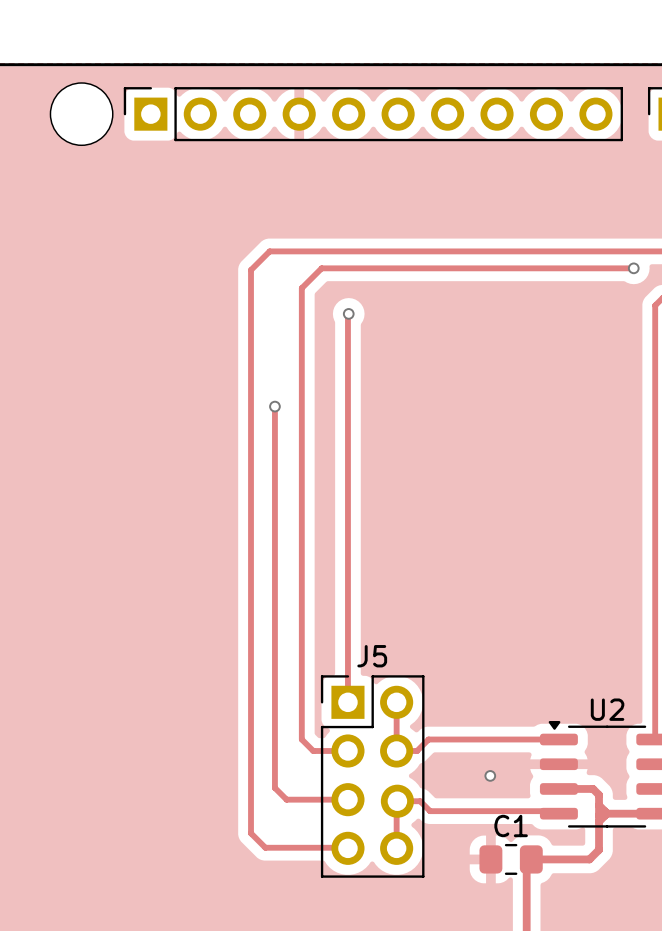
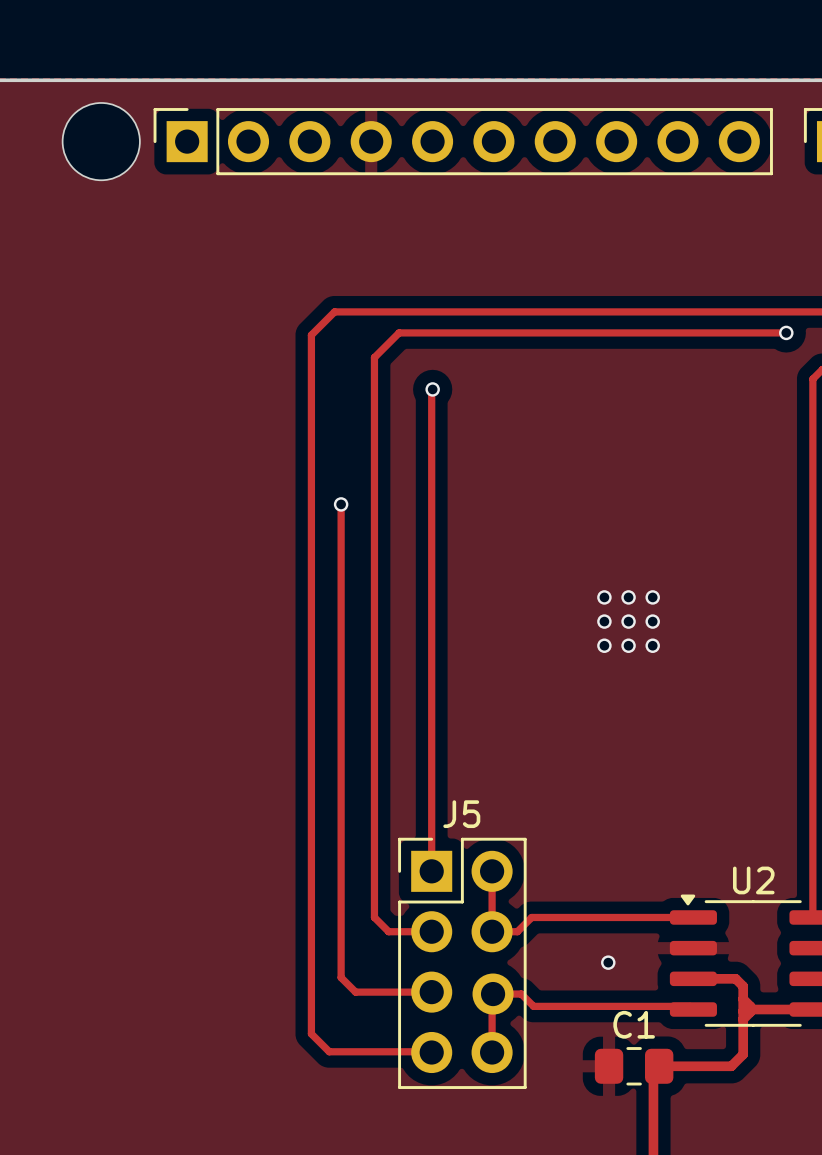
via: none -> (604, 597)
via: none -> (628, 597)
via: none -> (652, 597)
via: none -> (604, 621)
via: none -> (628, 621)
via: none -> (652, 621)
via: none -> (604, 645)
via: none -> (628, 645)
via: none -> (652, 645)

